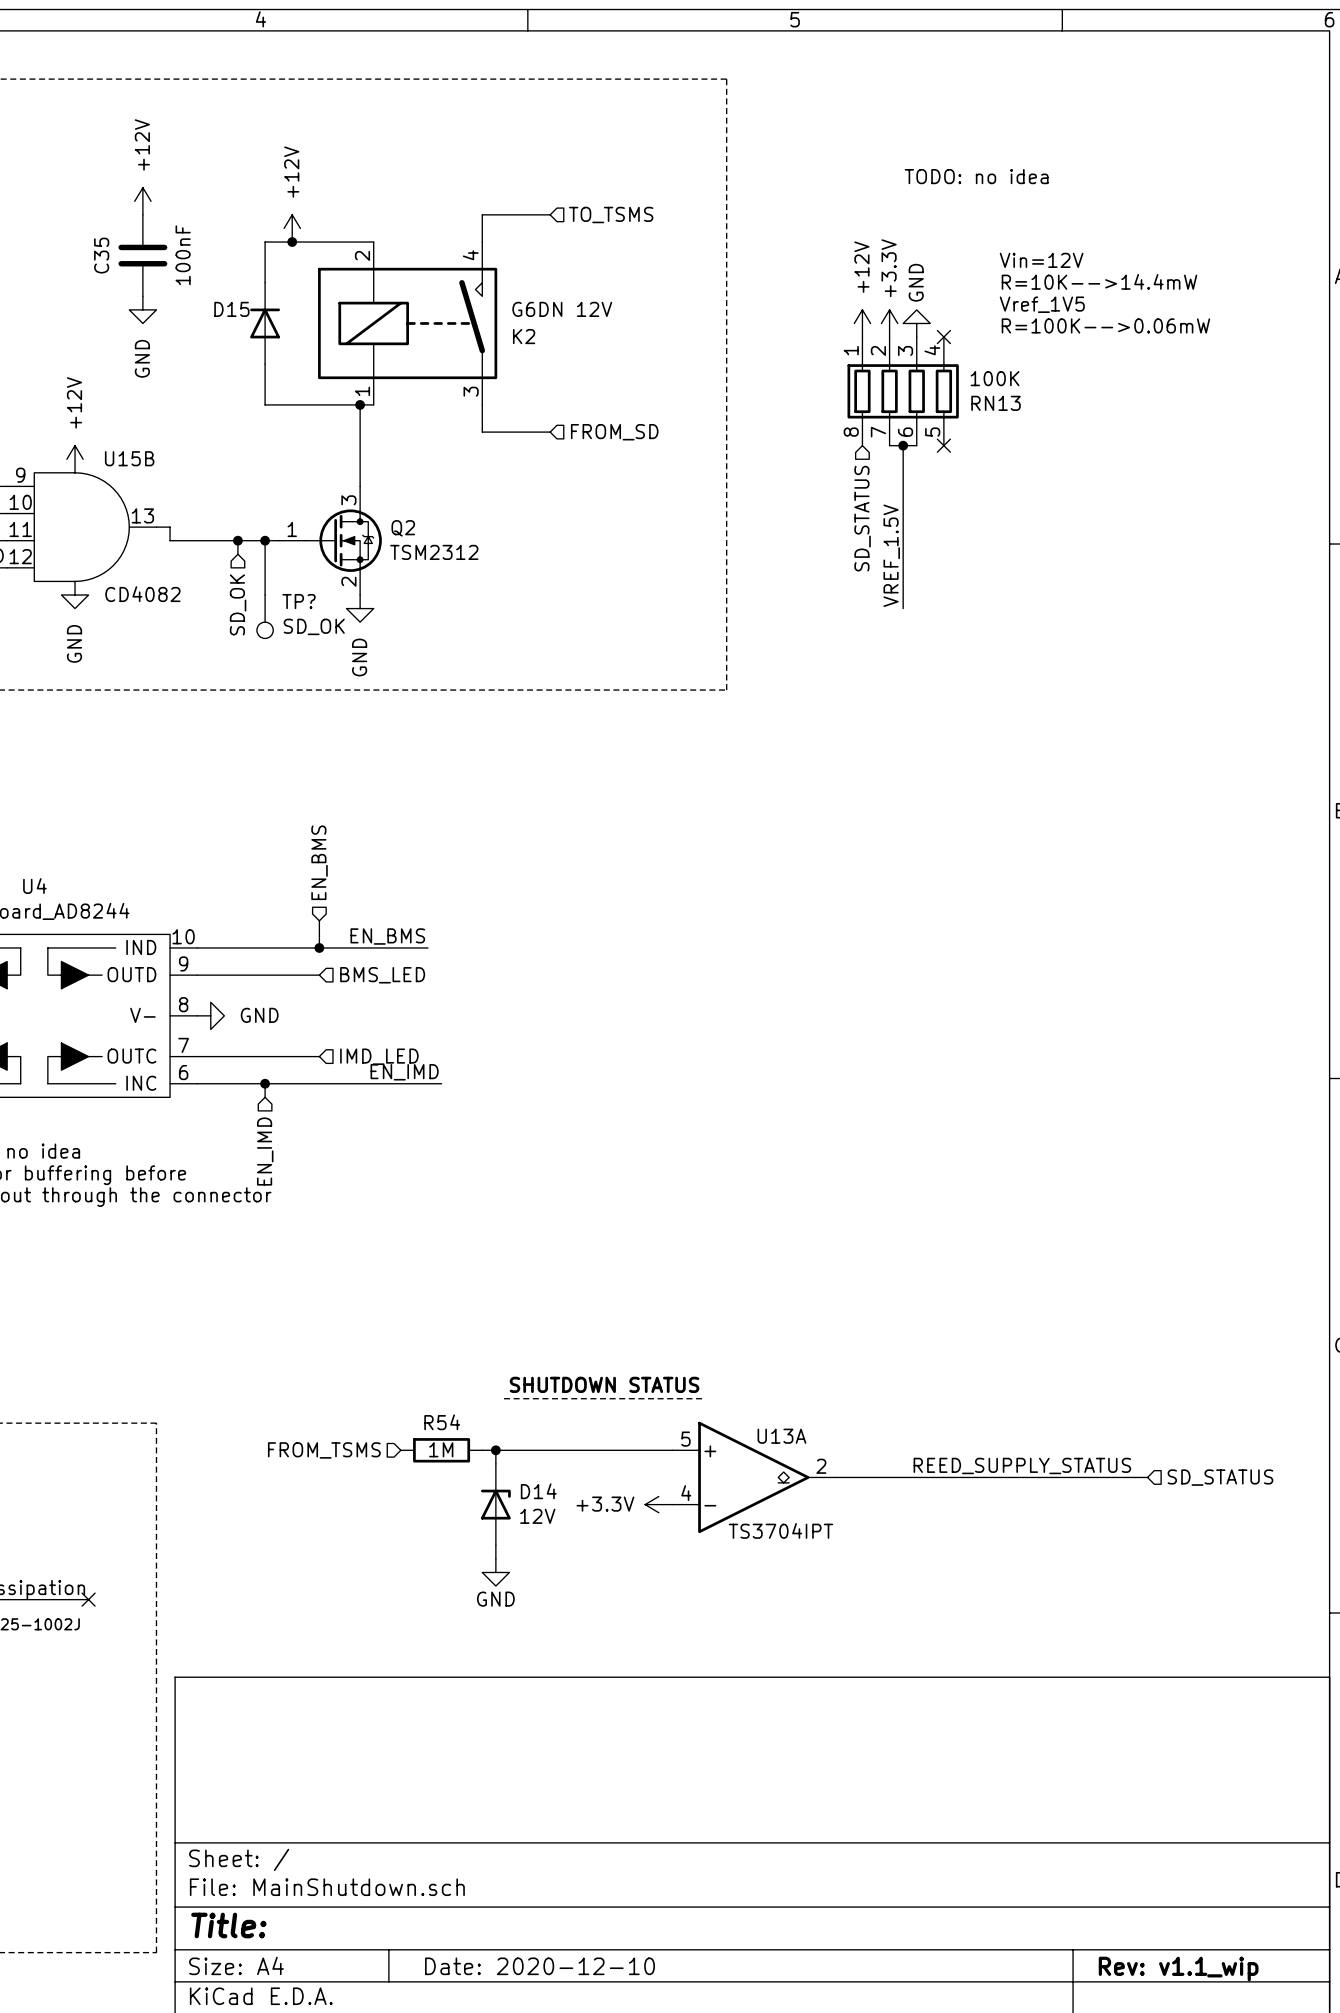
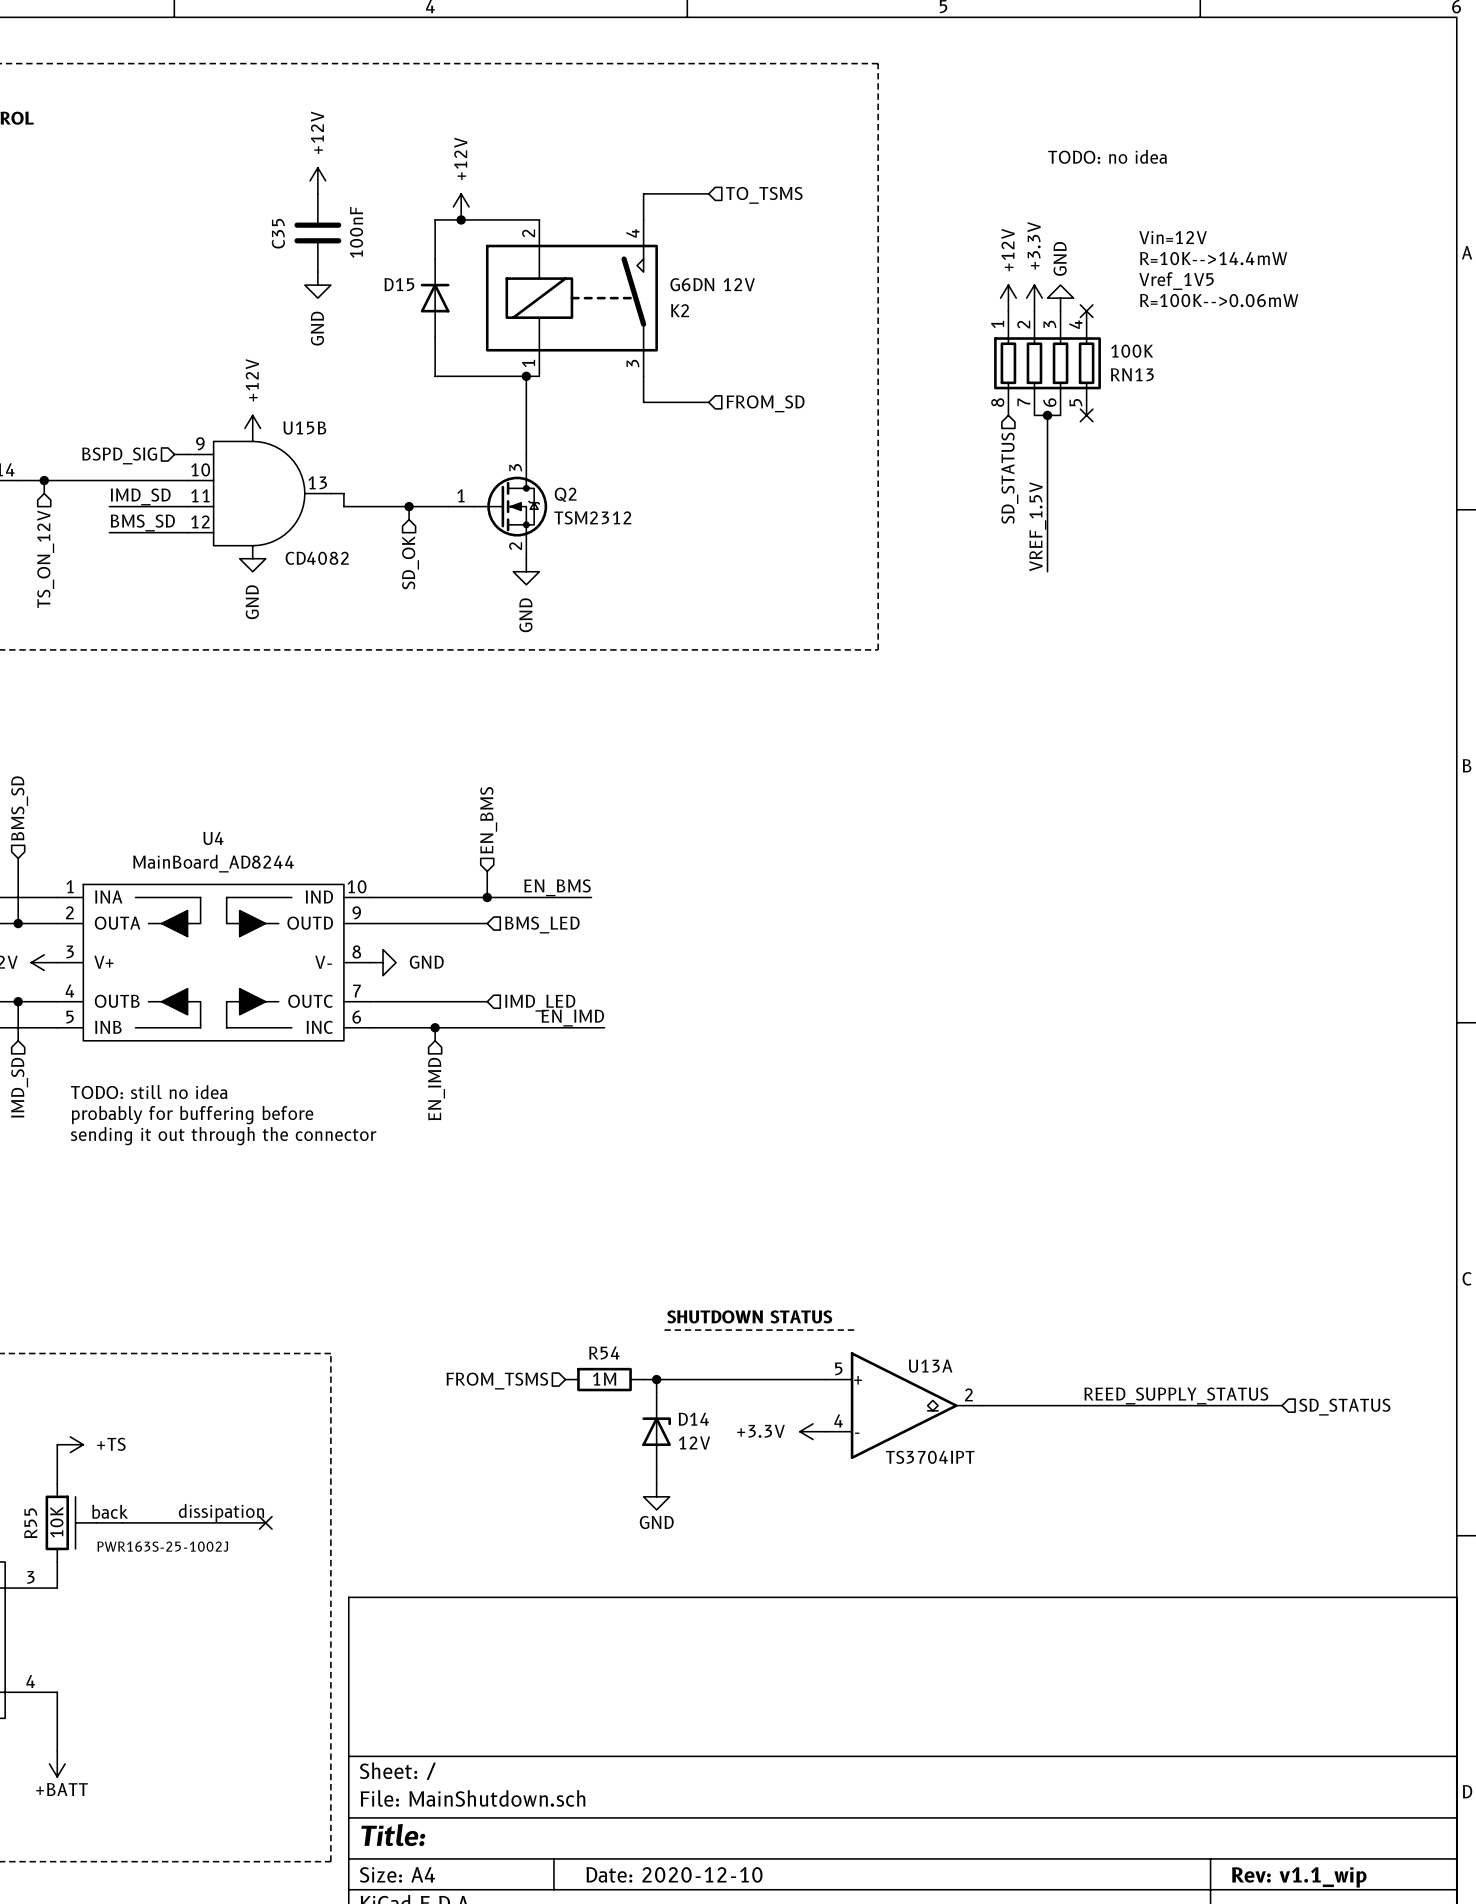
wire: (265, 540) (265, 595) -> none
junction: (265, 540) -> none
TP?: SD_OK (265, 616) -> none

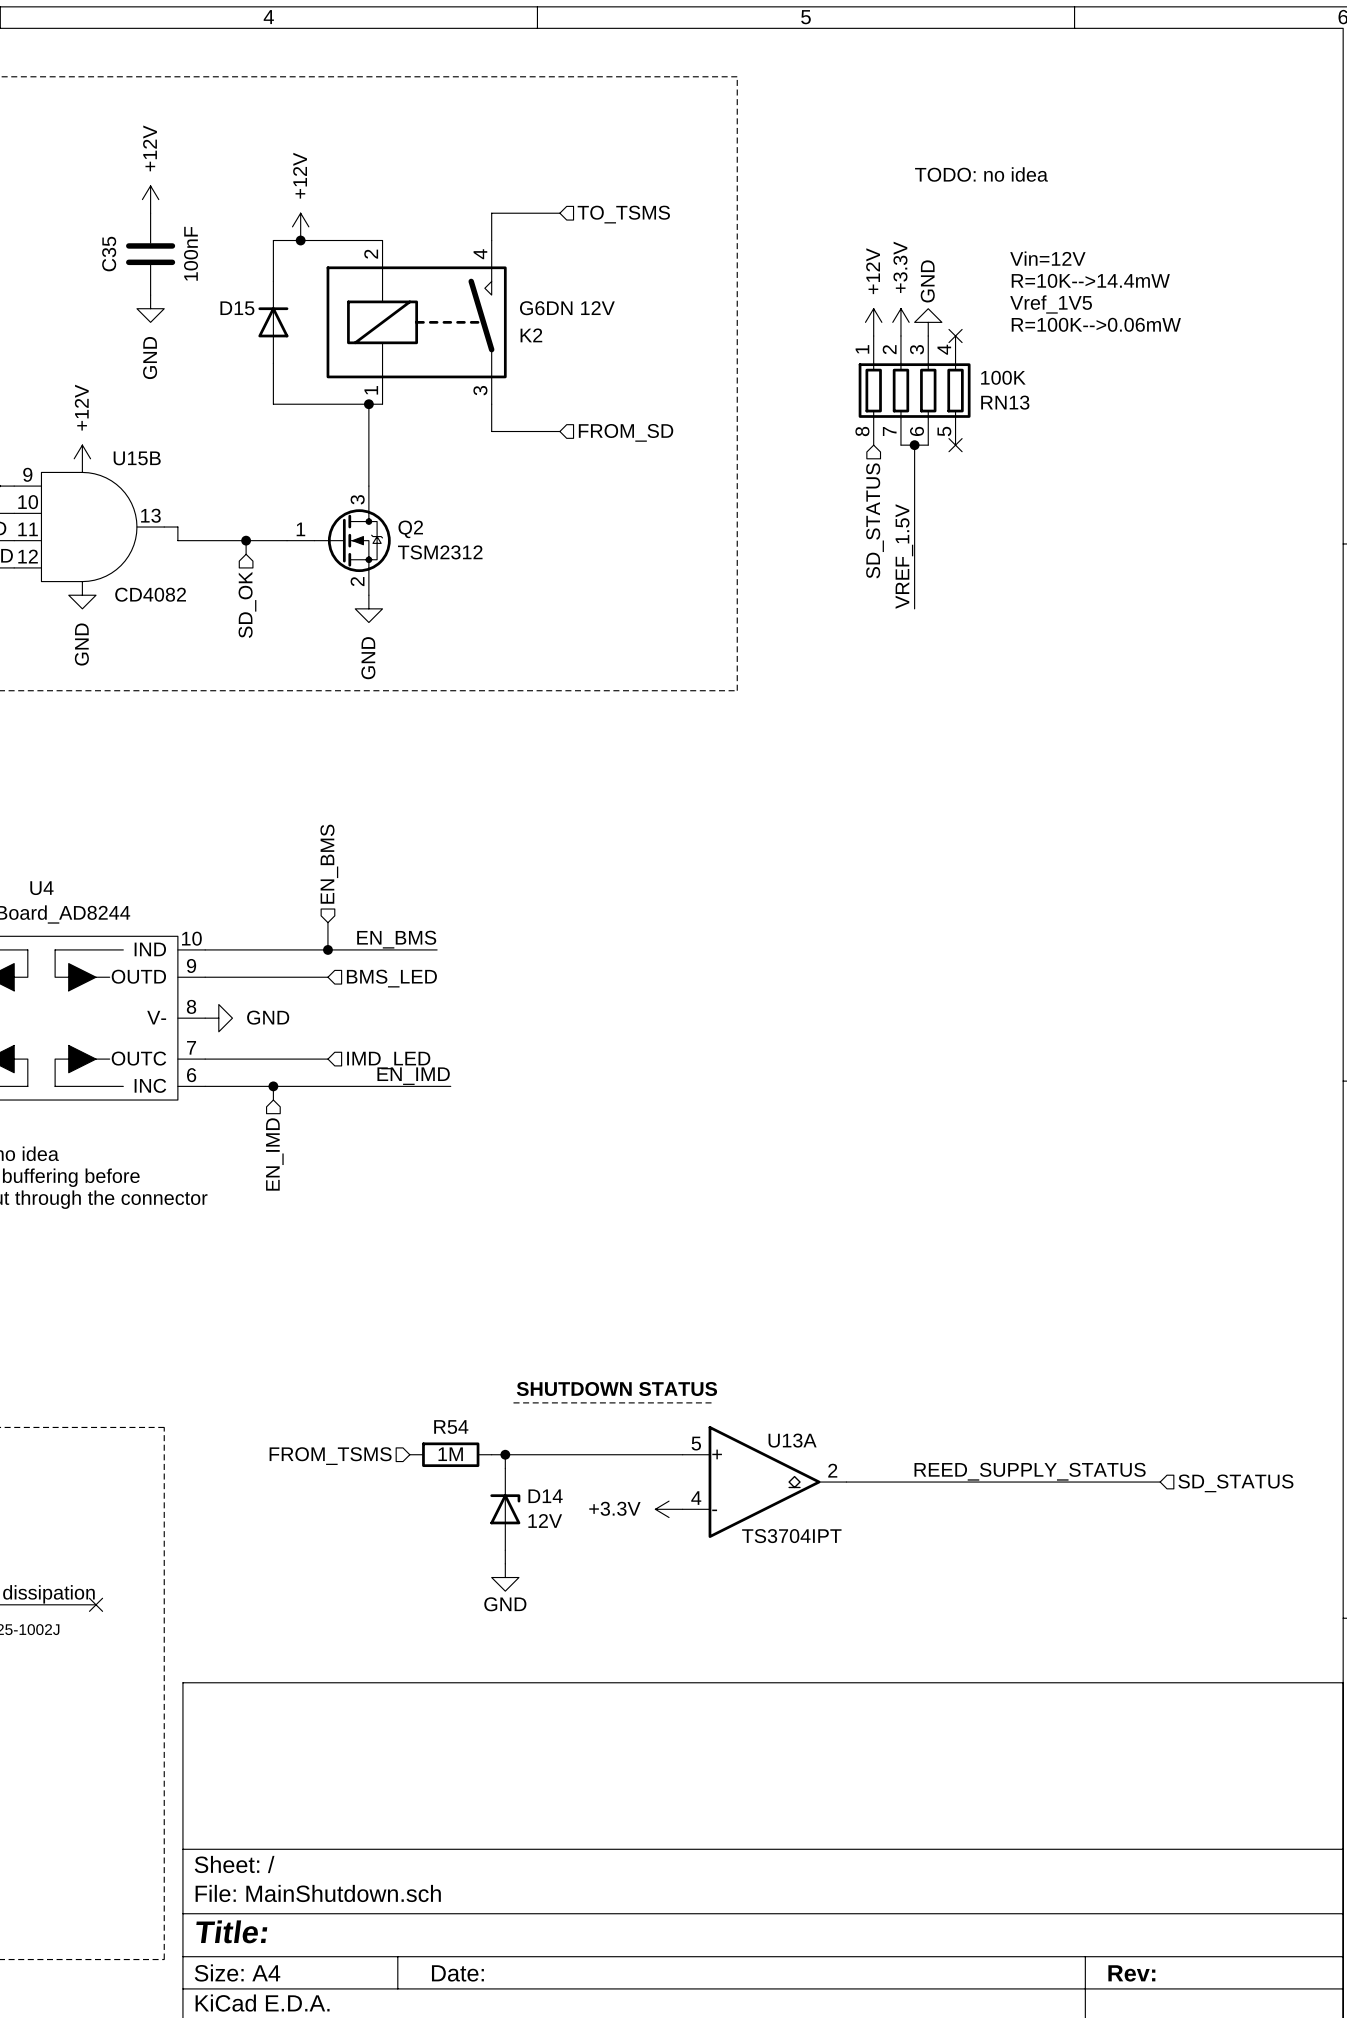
title block: Date: 2020-12-10 (674, 1874) -> Date: (457, 1973)
title block: Rev: v1.1_wip (1299, 1877) -> Rev: (1131, 1973)

